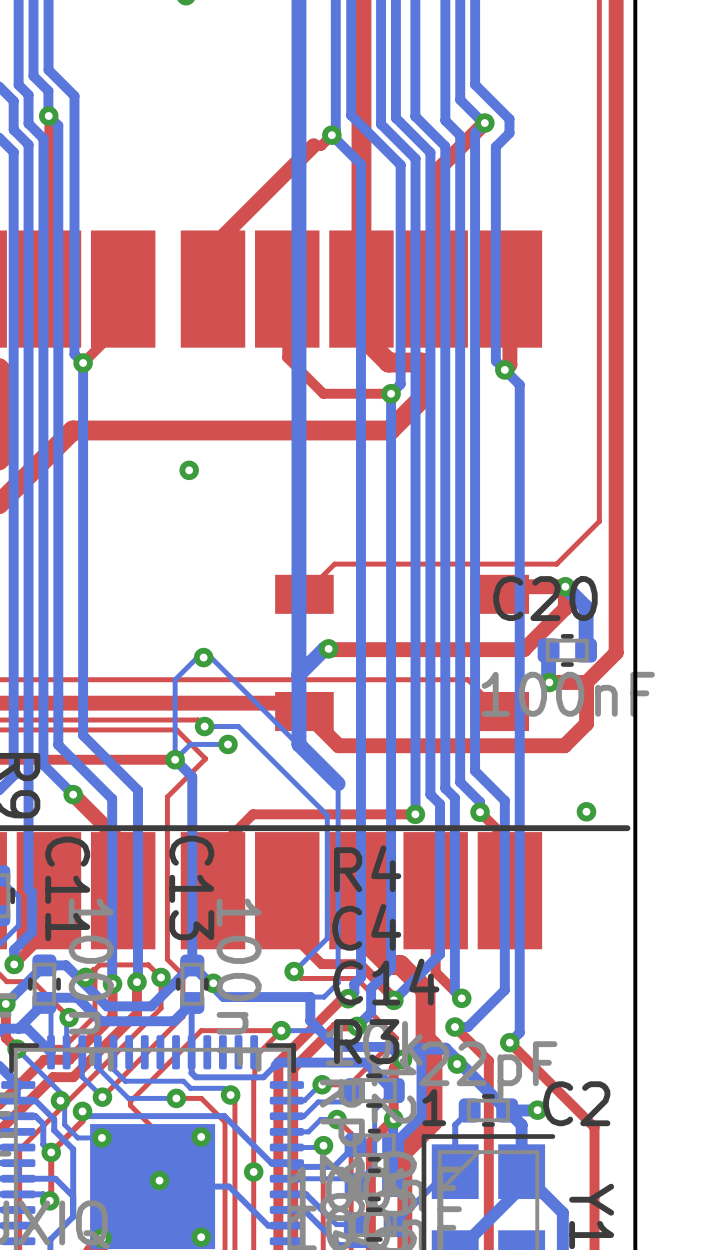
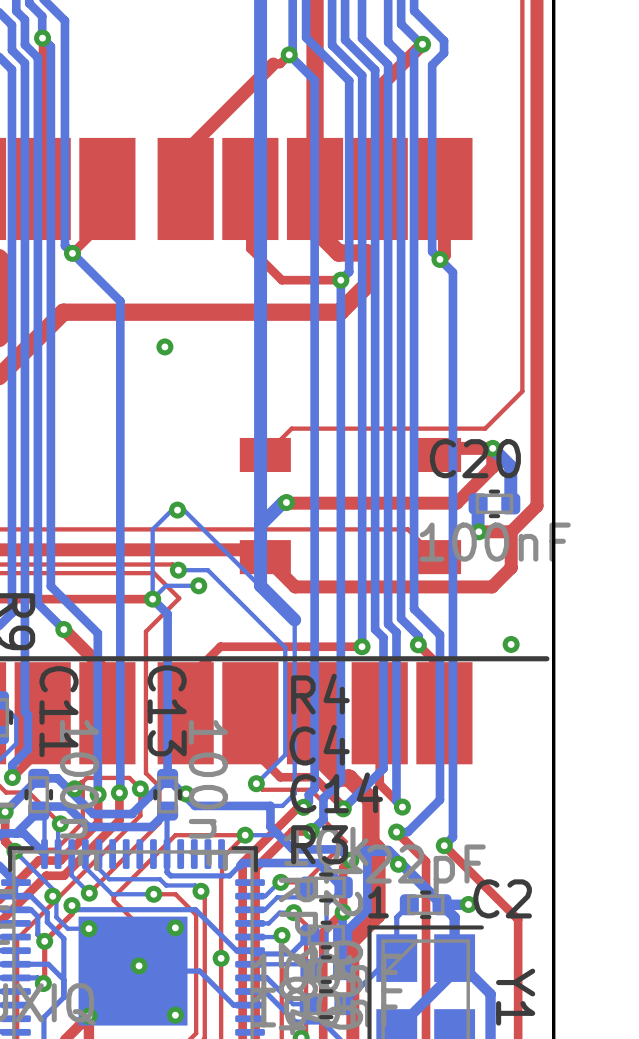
bottom track: (83, 362) (83, 735) (138, 790) -> (72, 253) (120, 301) (120, 625)

